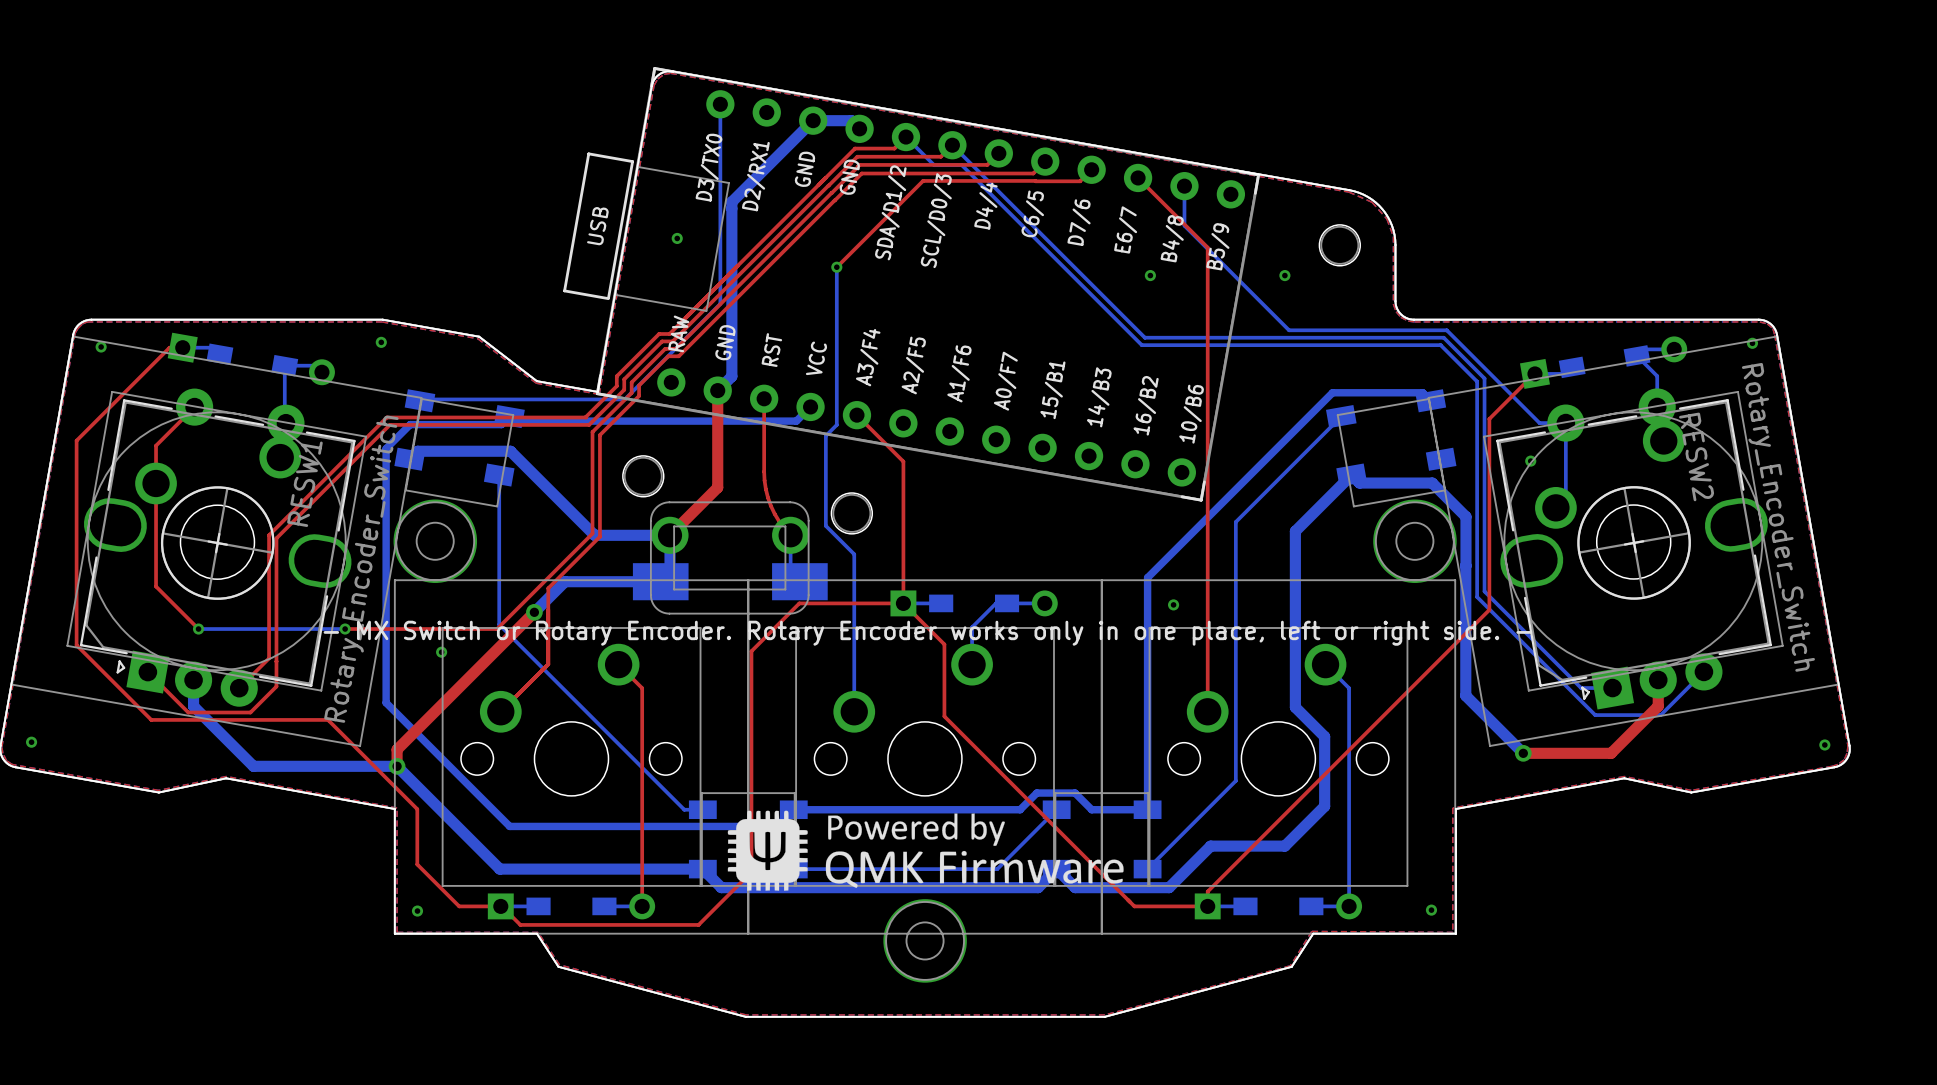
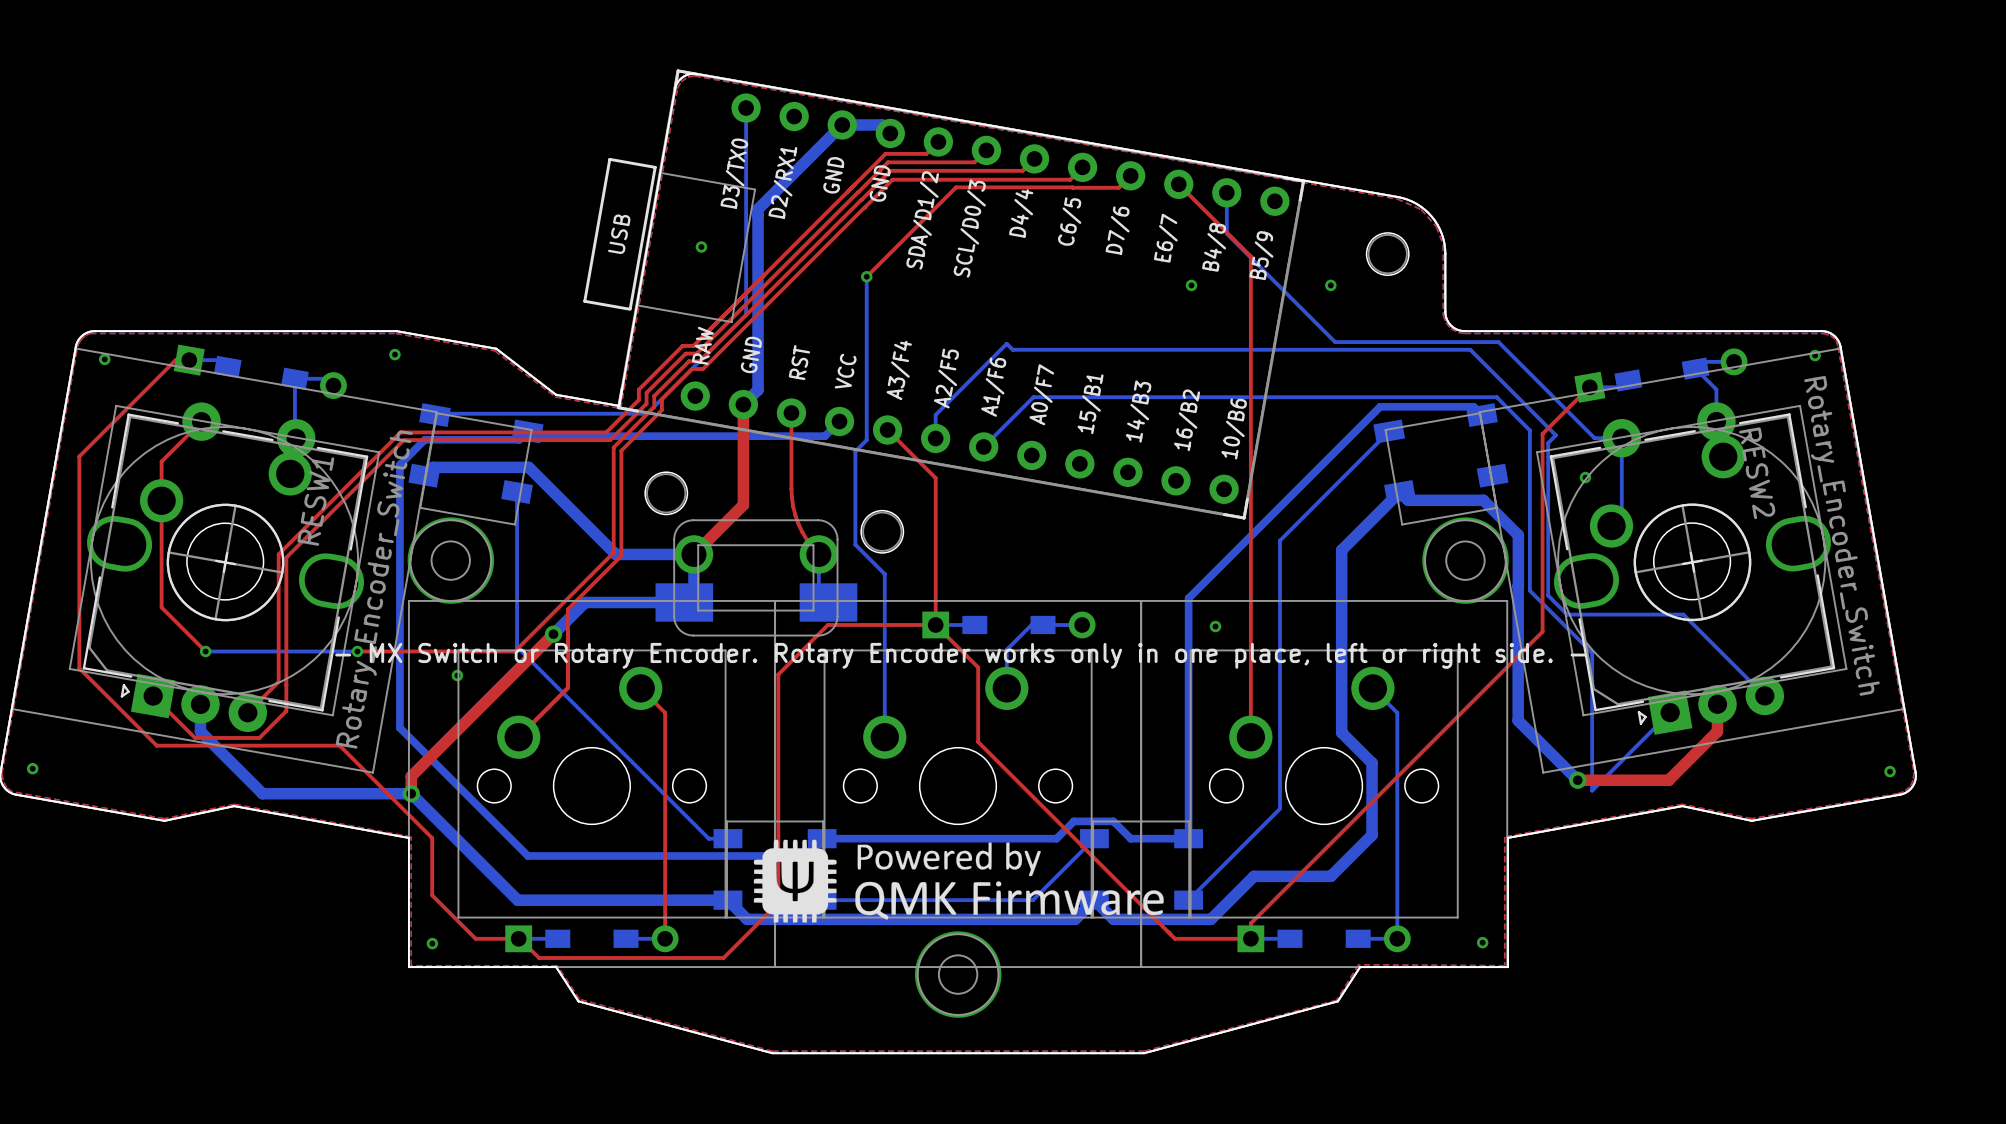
bottom track: (906, 137) (934, 165) (961, 165) (1141, 345) (1440, 345) (1477, 381) (1477, 415) -> (983, 446) (1033, 397) (1496, 397) (1529, 430)
bottom track: (952, 145) (1144, 337) -> (935, 438) (935, 414) (1006, 343) (1012, 349) (1185, 349)
bottom track: (1419, 337) (1443, 337) (1484, 378) (1484, 591) (1581, 688) (1612, 688) -> (1470, 349) (1555, 435) (1548, 443) (1548, 595) (1567, 614) (1683, 614) (1764, 695)
bottom track: (1477, 570) (1477, 596) (1595, 715) (1660, 715) (1703, 671) -> (1529, 590) (1592, 653) (1592, 790) (1670, 712)

